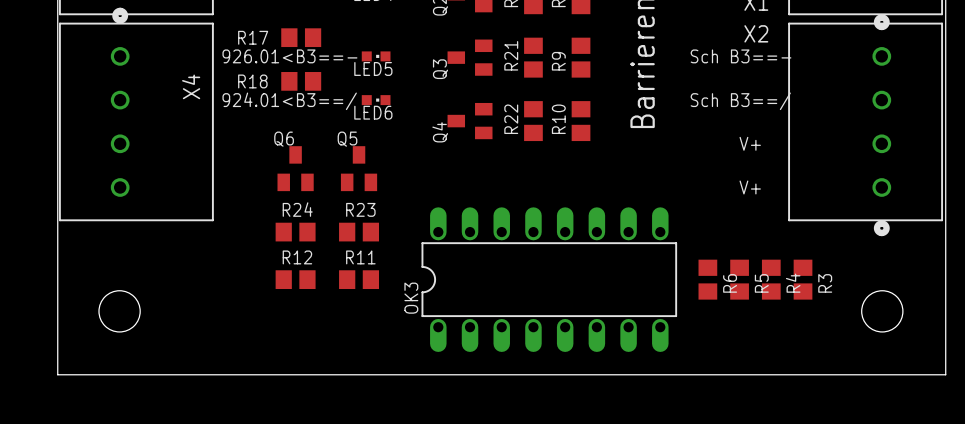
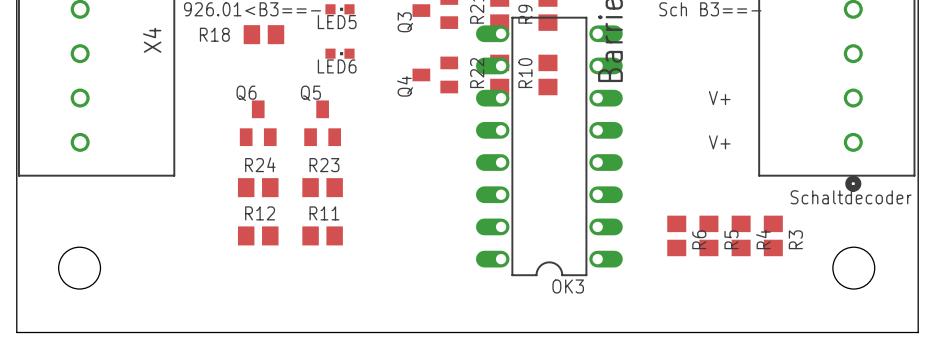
text: 924.01<B3==/ (289, 101) -> none
text: Sch B3==/ (740, 101) -> none
text: none -> Schaltdecoder (851, 197)
OK3 rotation: 0° (549, 279) -> 90° counterclockwise (549, 146)

